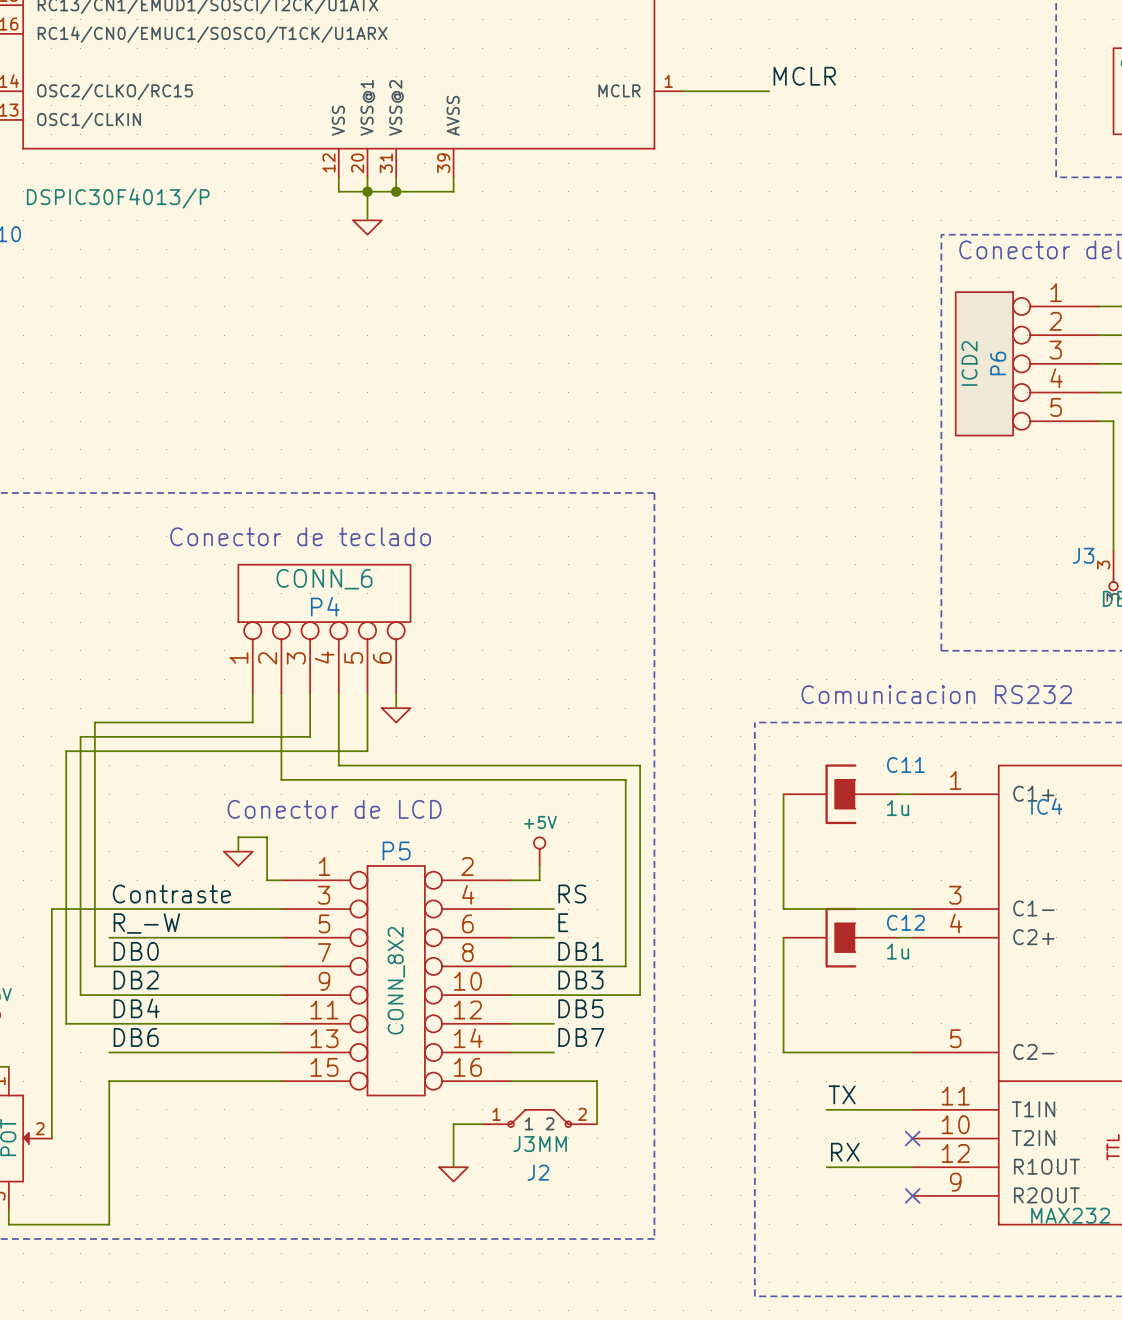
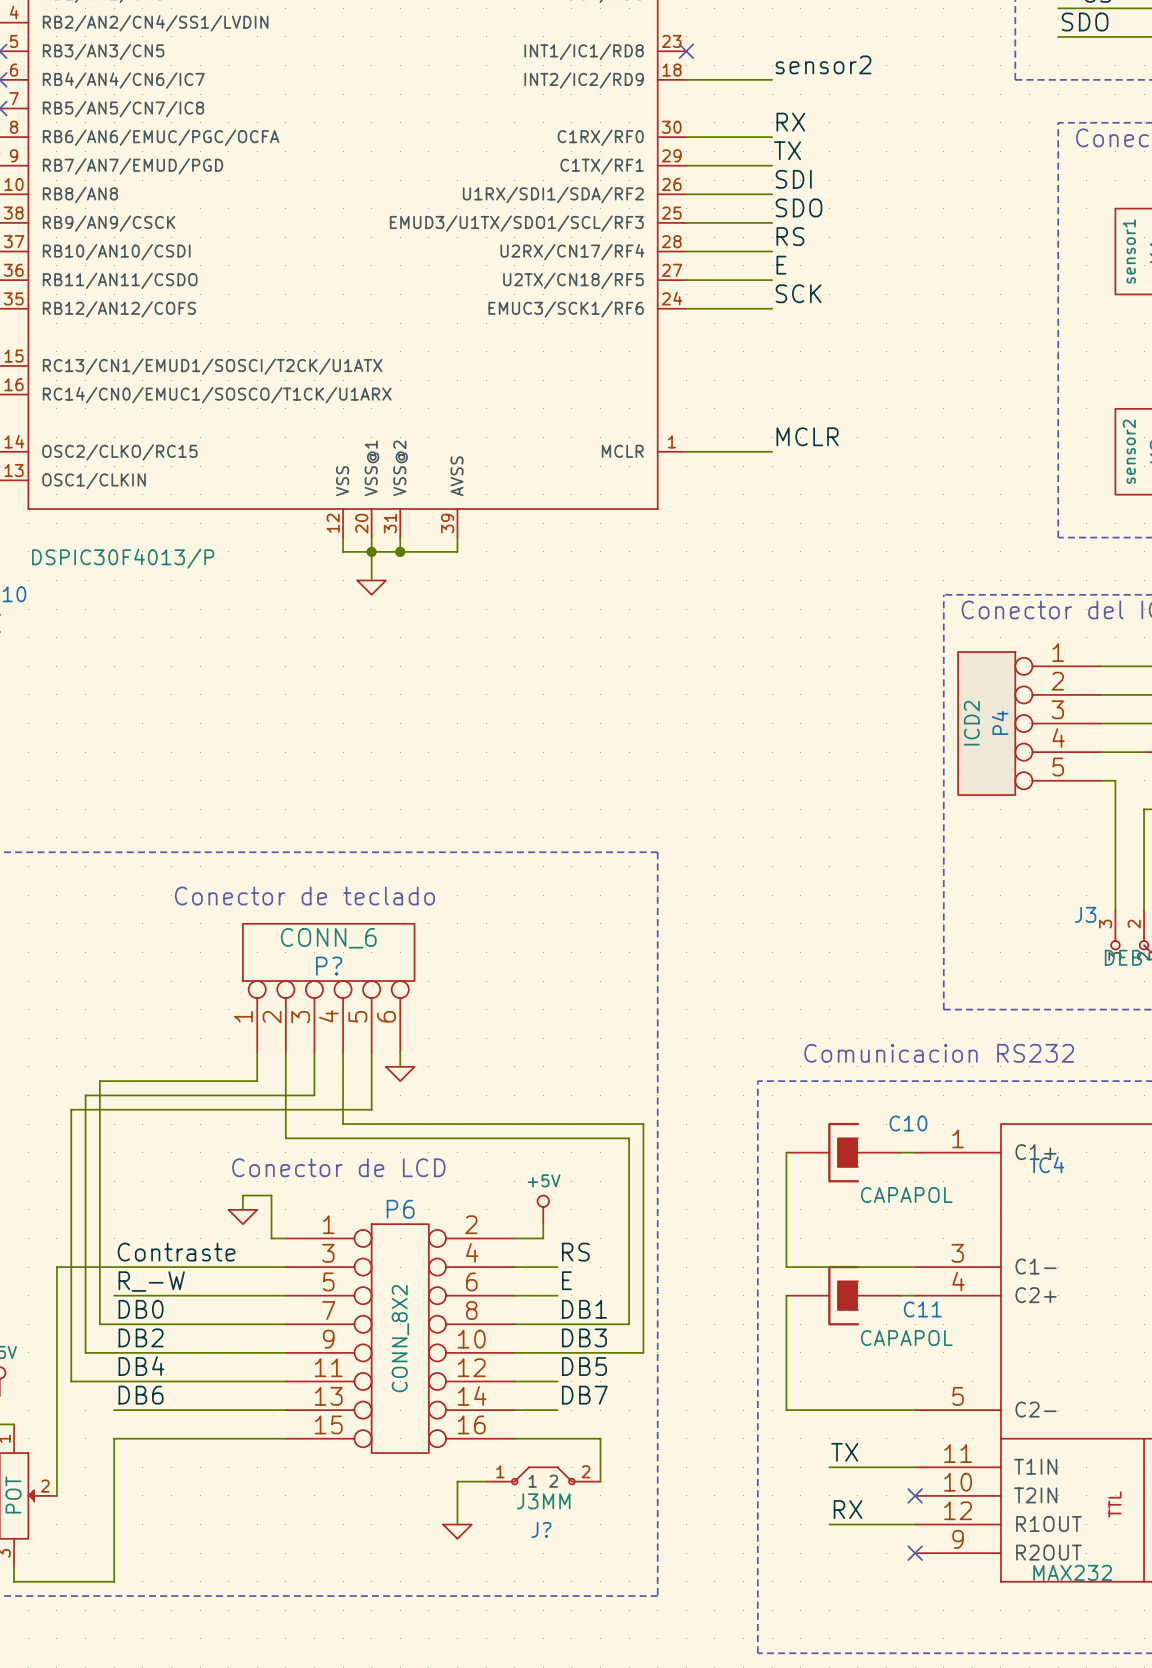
P6 name: P6 (998, 363) -> P4 (1000, 722)
P4 name: P4 (325, 606) -> P? (329, 966)
C11 name: C11 (905, 765) -> C10 (908, 1123)
C11 value: 1u (898, 808) -> CAPAPOL (906, 1195)
P5 name: P5 (396, 850) -> P6 (400, 1209)
C12 name: C12 (905, 922) -> C11 (922, 1309)
C12 value: 1u (898, 951) -> CAPAPOL (906, 1338)
J2 name: J2 (538, 1172) -> J? (541, 1529)

